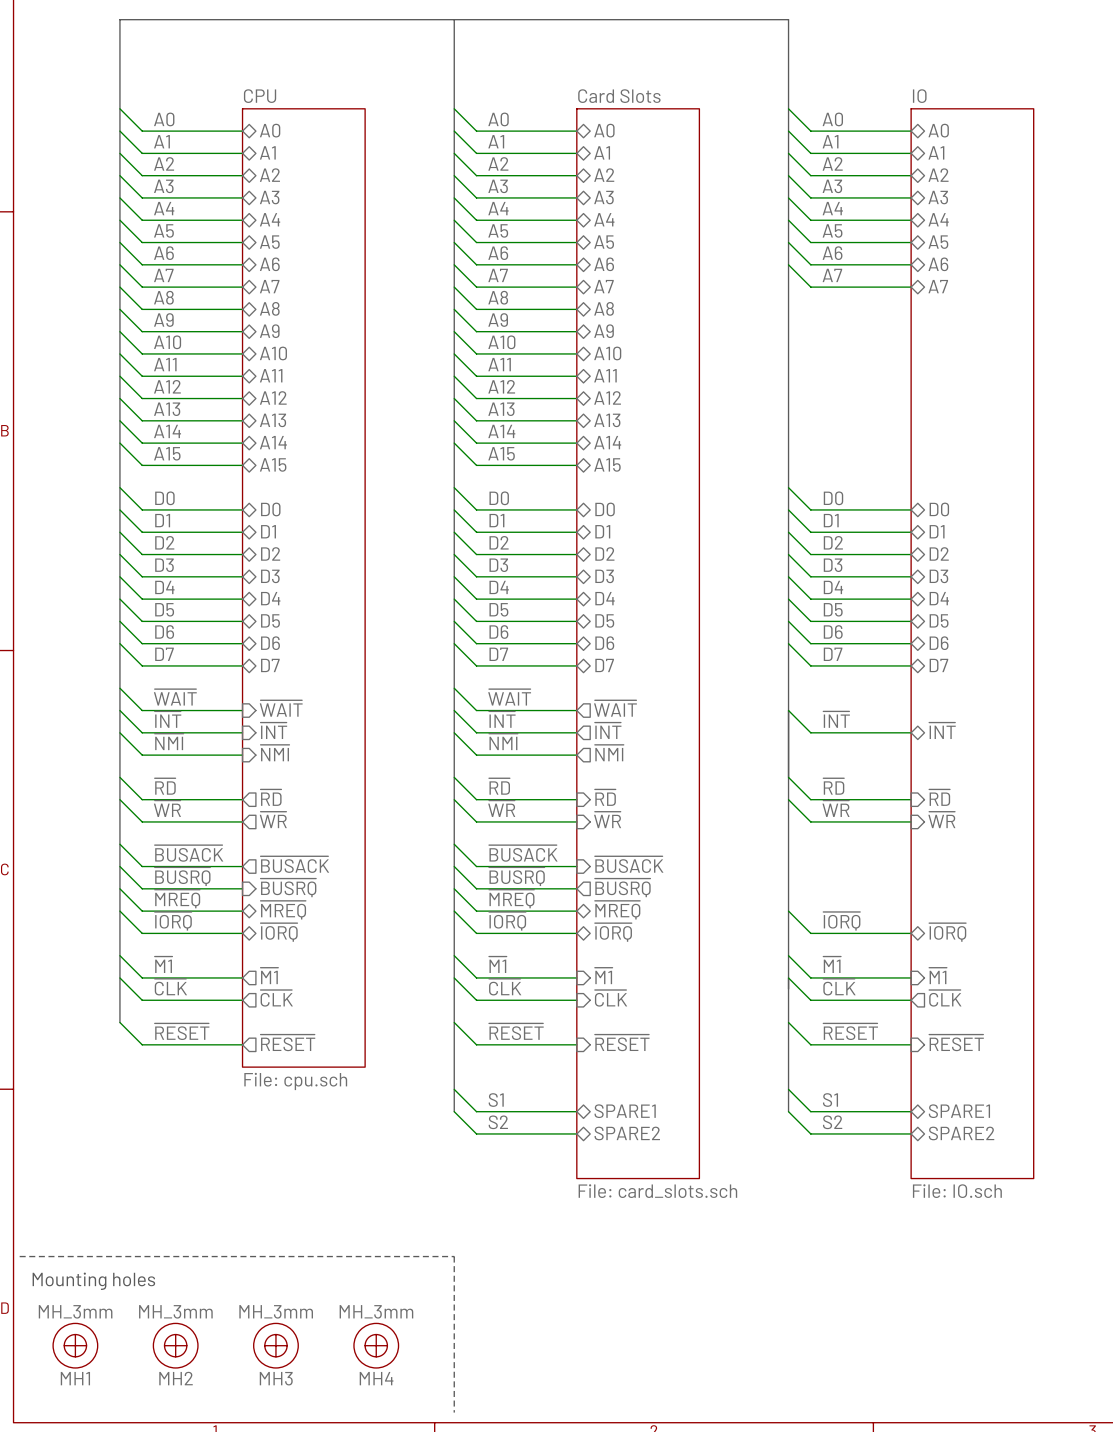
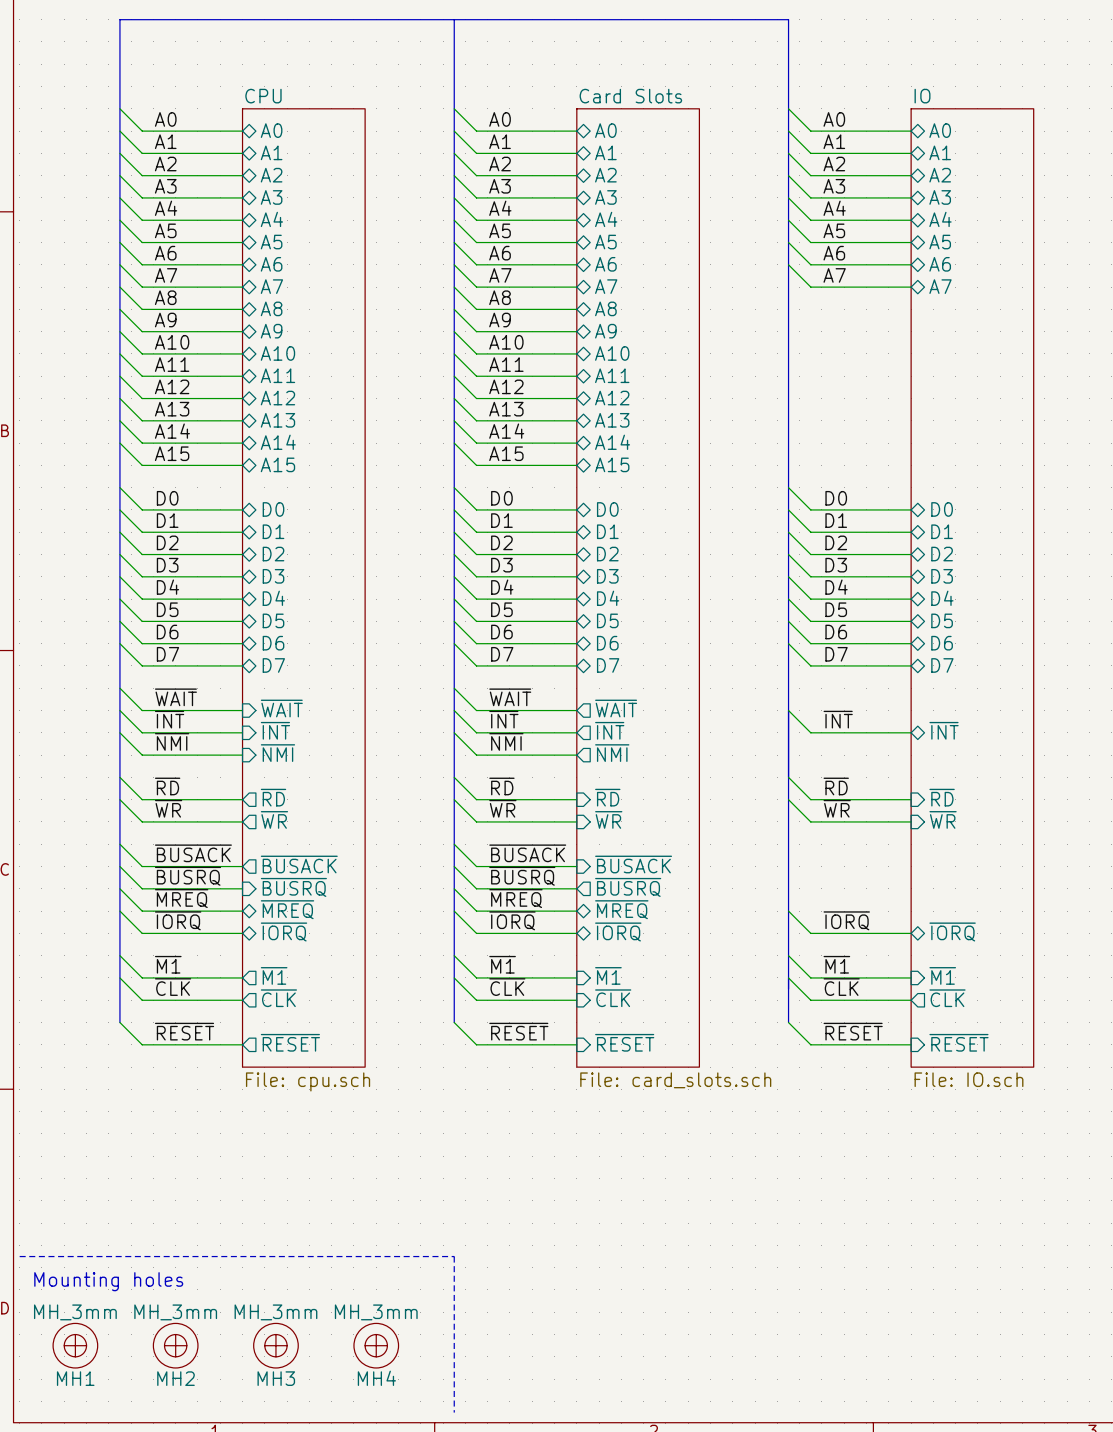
sheet Card Slots: none -> File: card_slots.sch (638, 587)
sheet IO: none -> File: IO.sch (972, 587)
sheet Card Slots: File: card_slots.sch (638, 643) -> none
sheet IO: File: IO.sch (972, 643) -> none
bus: (454, 1022) (454, 1111) -> none
bus: (788, 1022) (788, 1111) -> none
wire: (454, 1089) (476, 1111) (576, 1111) -> none
wire: (788, 1089) (810, 1111) (911, 1111) -> none
label: S1 (496, 1100) -> none
label: S1 (830, 1100) -> none
wire: (454, 1111) (476, 1133) (576, 1133) -> none
sheet pin: SPARE1 (625, 1111) -> none
wire: (788, 1111) (810, 1133) (911, 1133) -> none
sheet pin: SPARE1 (959, 1111) -> none
label: S2 (498, 1122) -> none
label: S2 (832, 1122) -> none
sheet pin: SPARE2 (627, 1133) -> none
sheet pin: SPARE2 (961, 1133) -> none

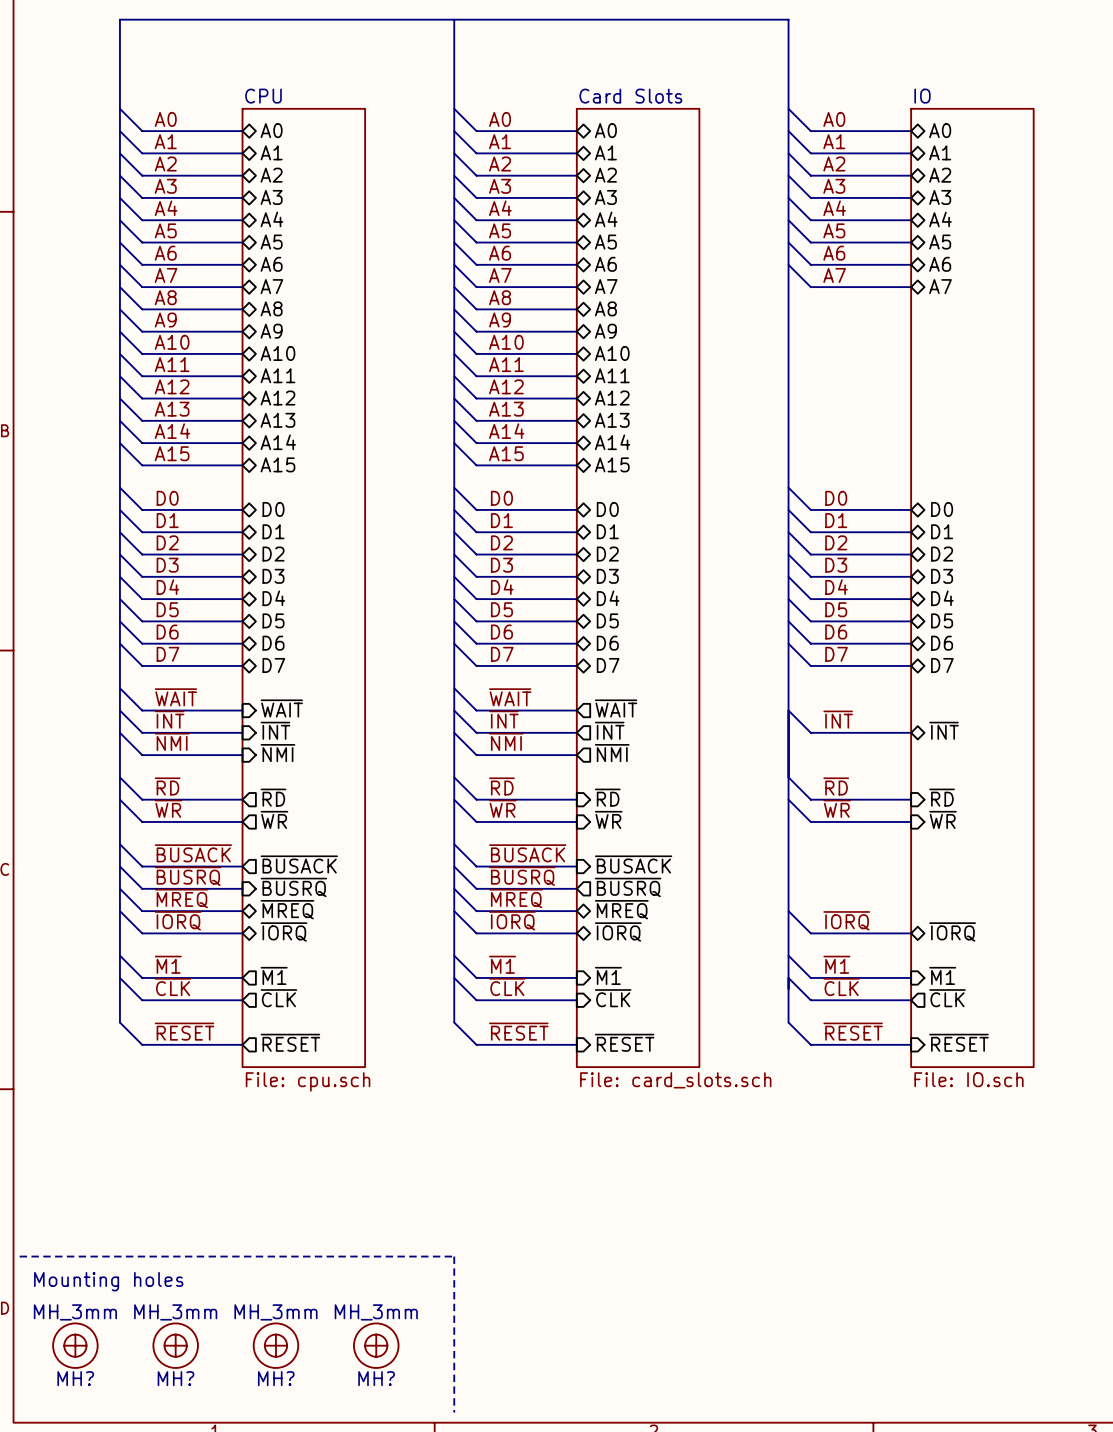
MH1 name: MH1 (75, 1378) -> MH? (75, 1378)
MH2 name: MH2 (175, 1378) -> MH? (175, 1378)
MH3 name: MH3 (276, 1378) -> MH? (276, 1378)
MH4 name: MH4 (376, 1378) -> MH? (376, 1378)

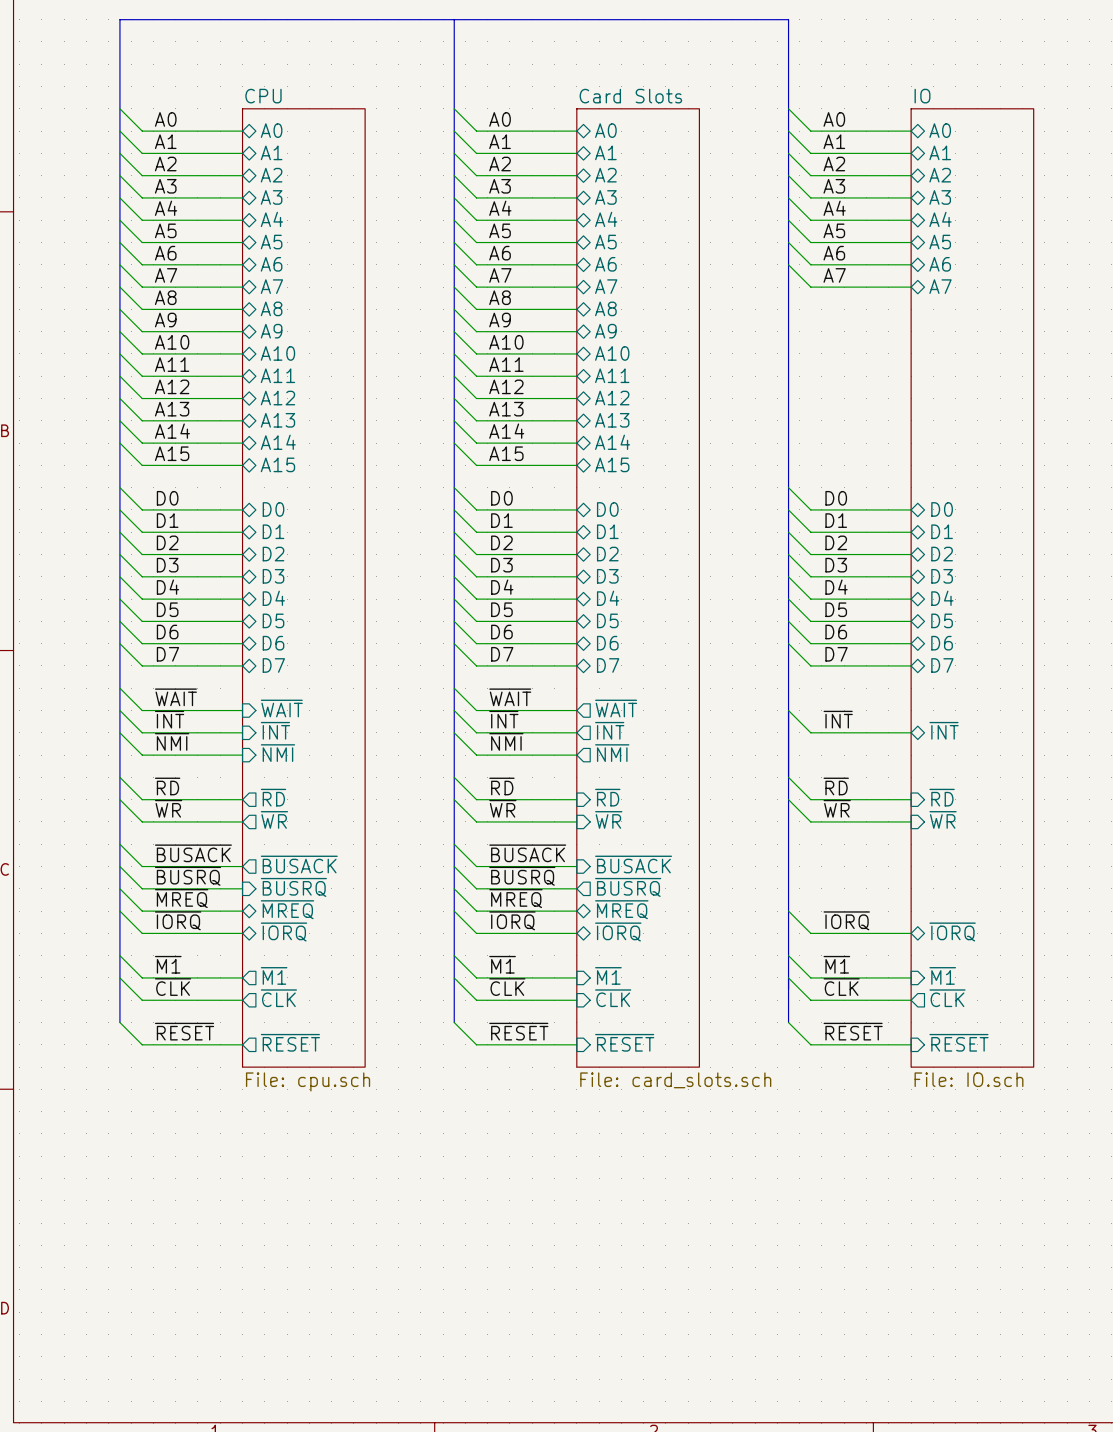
line: (19, 1256) (454, 1256) (454, 1412) -> none
text: Mounting holes (108, 1281) -> none
MH?: MH_3mm (75, 1345) -> none
MH?: MH_3mm (175, 1345) -> none
MH?: MH_3mm (275, 1345) -> none
MH?: MH_3mm (376, 1345) -> none

